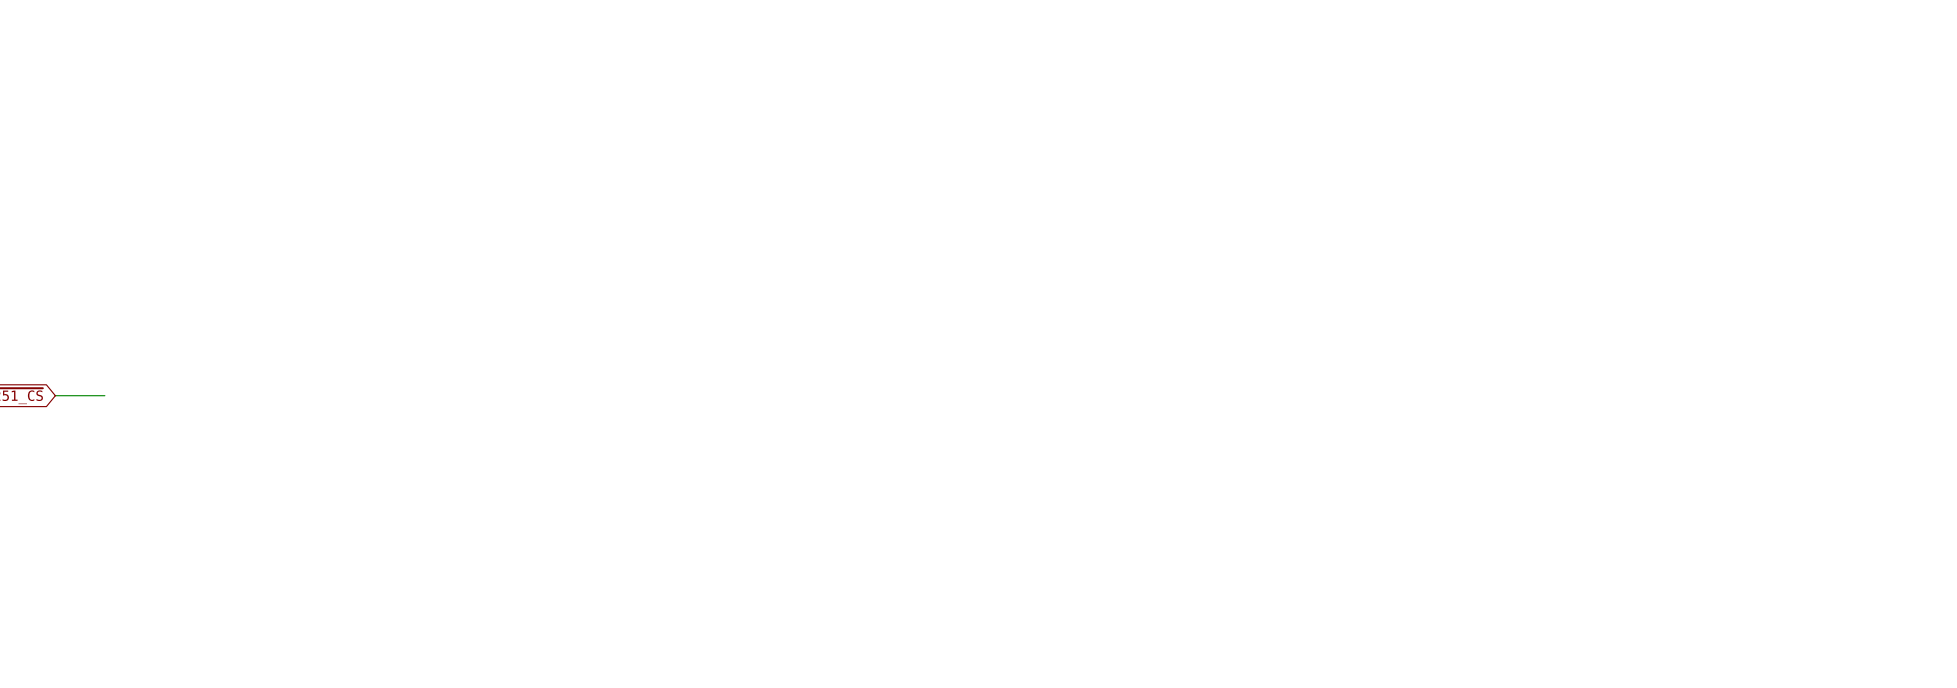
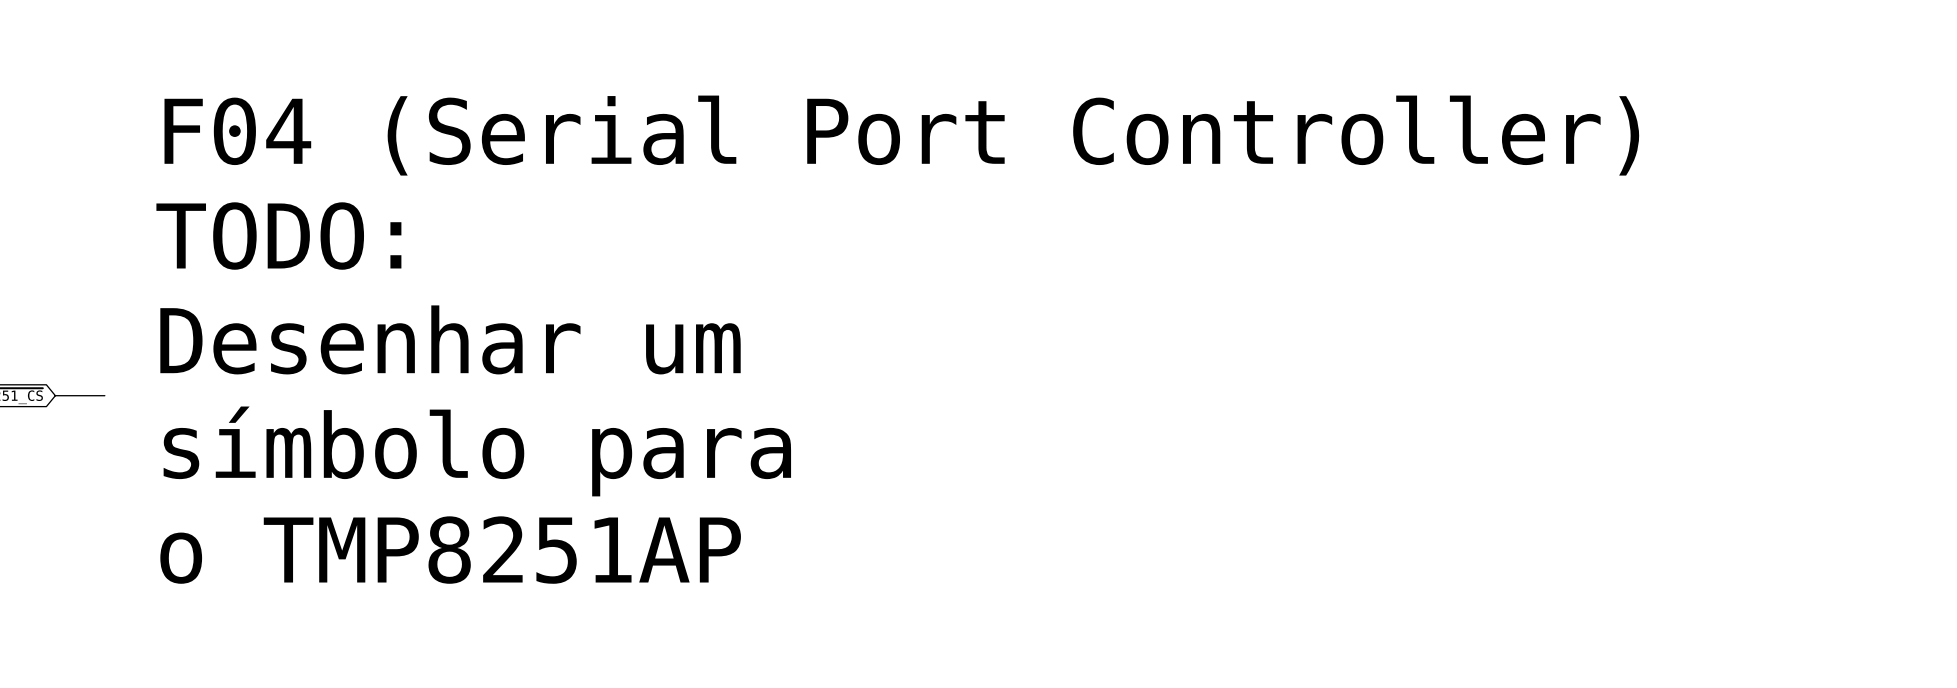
text: none -> F04 (Serial Port Controller) (901, 135)
text: none -> TODO: (278, 236)
text: none -> Desenhar um (450, 339)
text: none -> símbolo para (477, 451)
text: none -> o TMP8251AP (450, 550)

